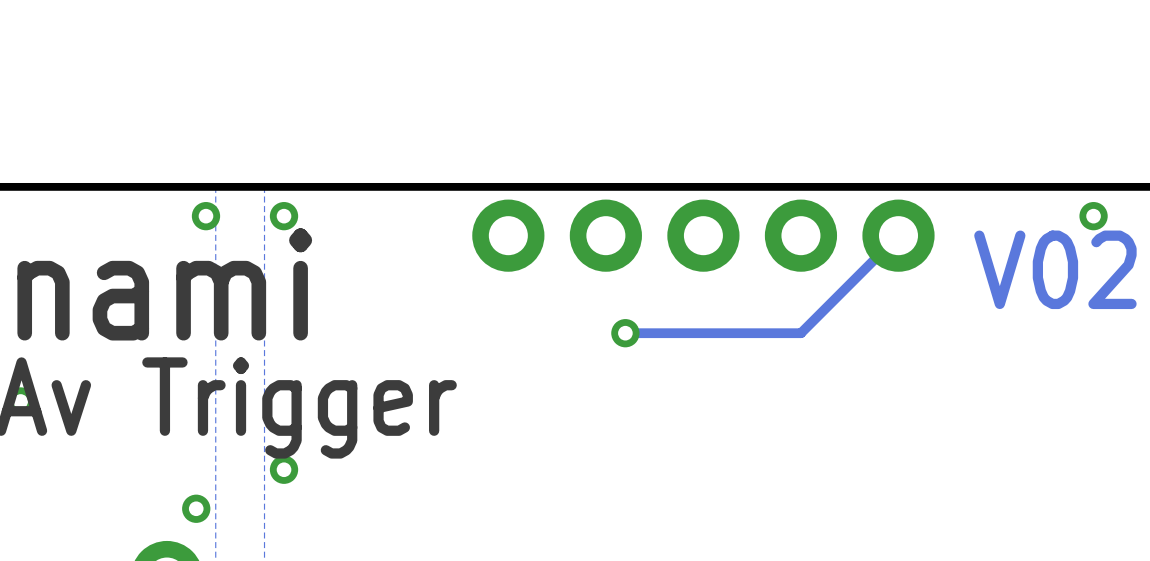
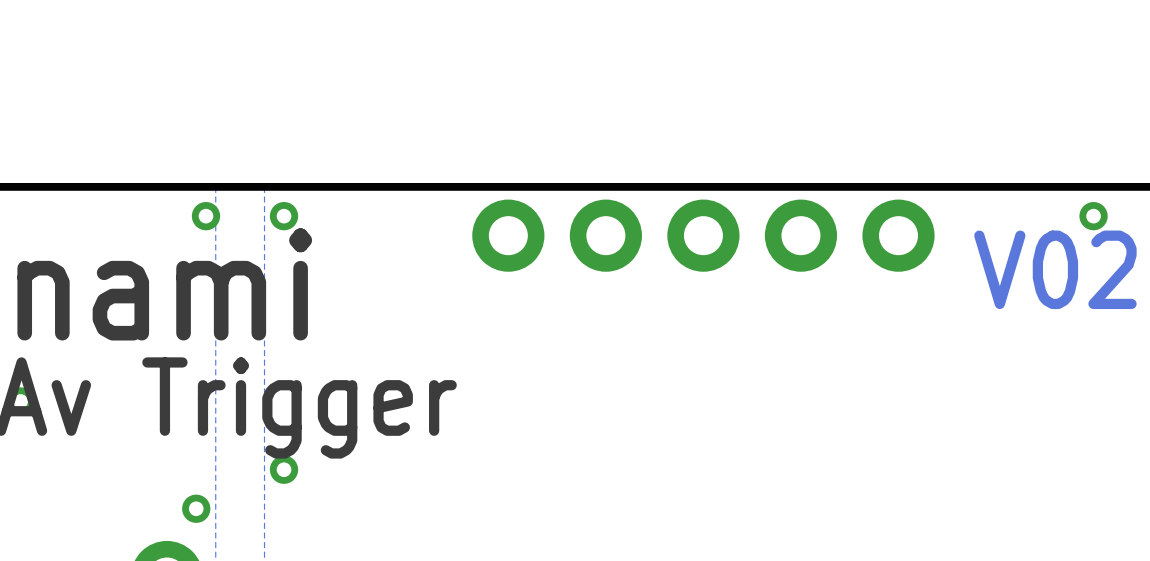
track: (898, 235) (800, 333) (625, 333) -> none
via: (625, 333) -> none

